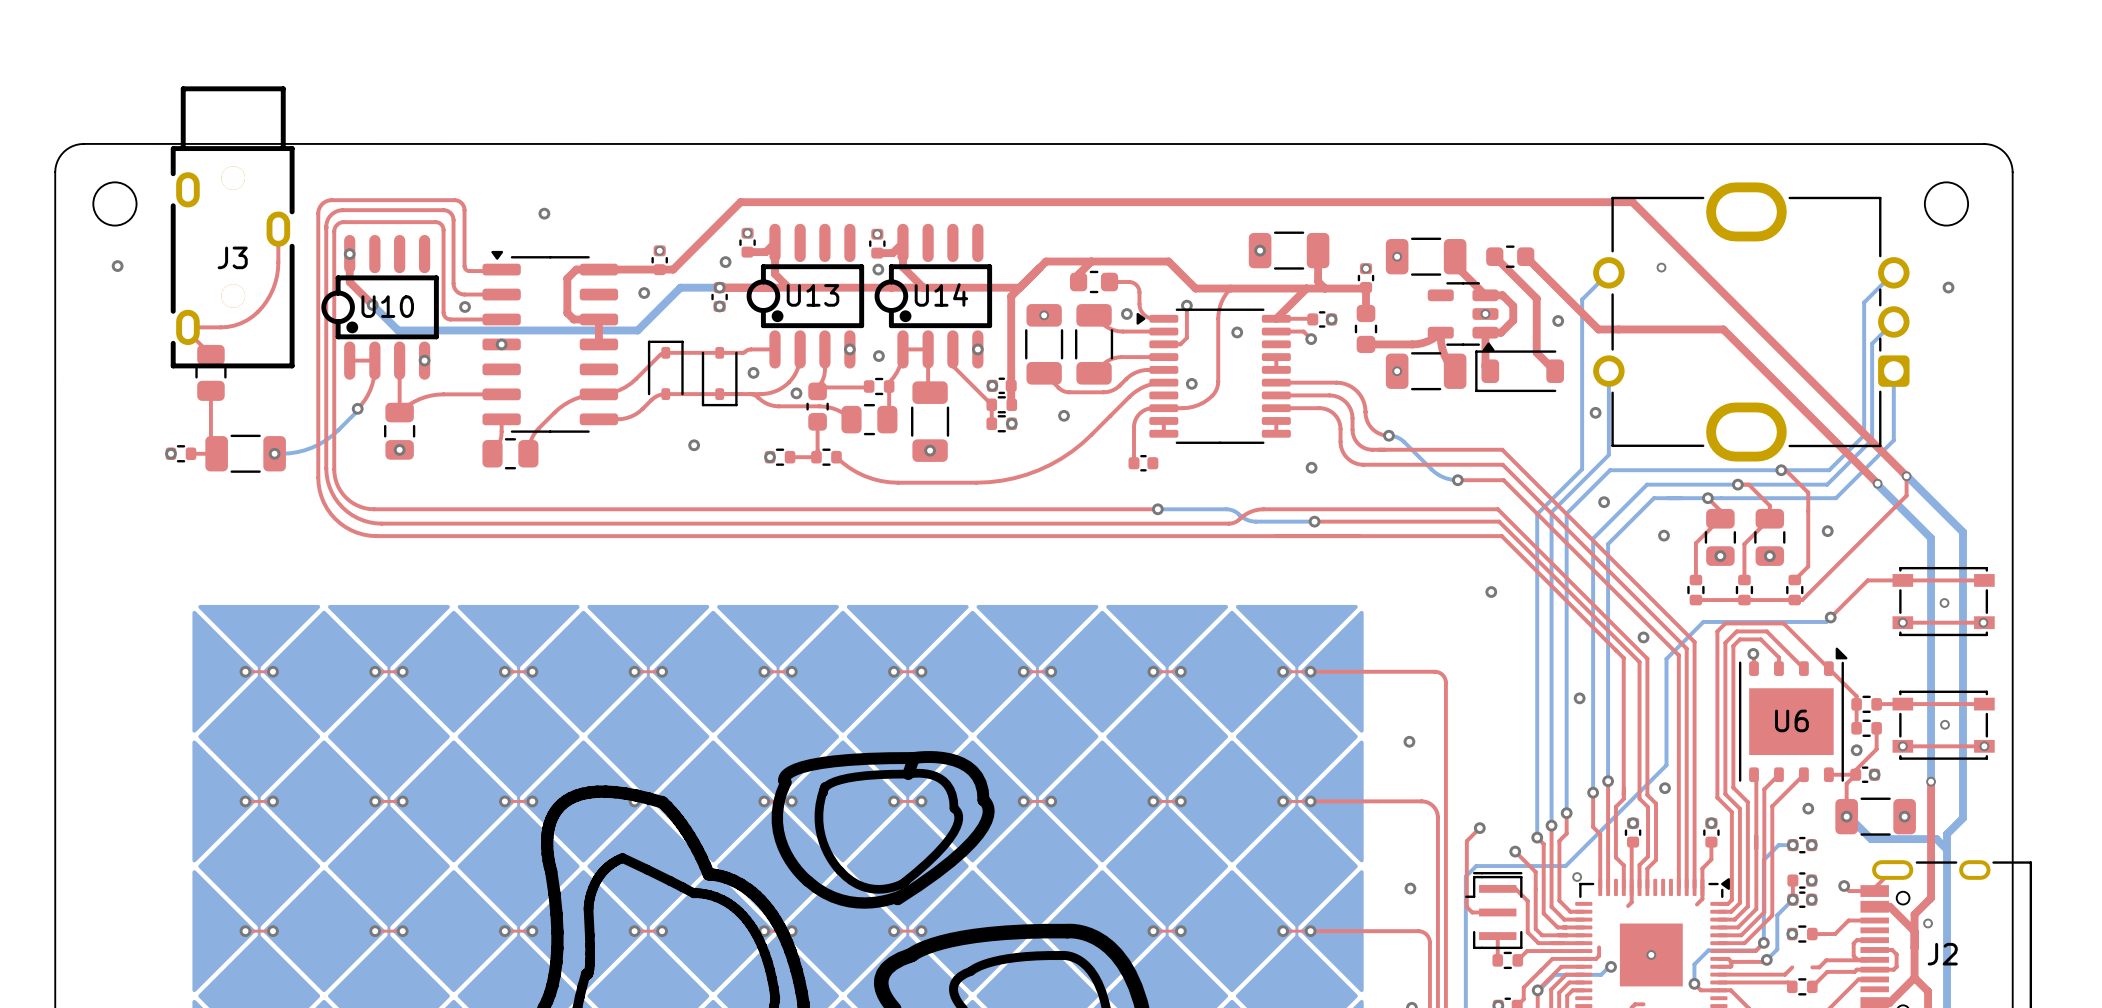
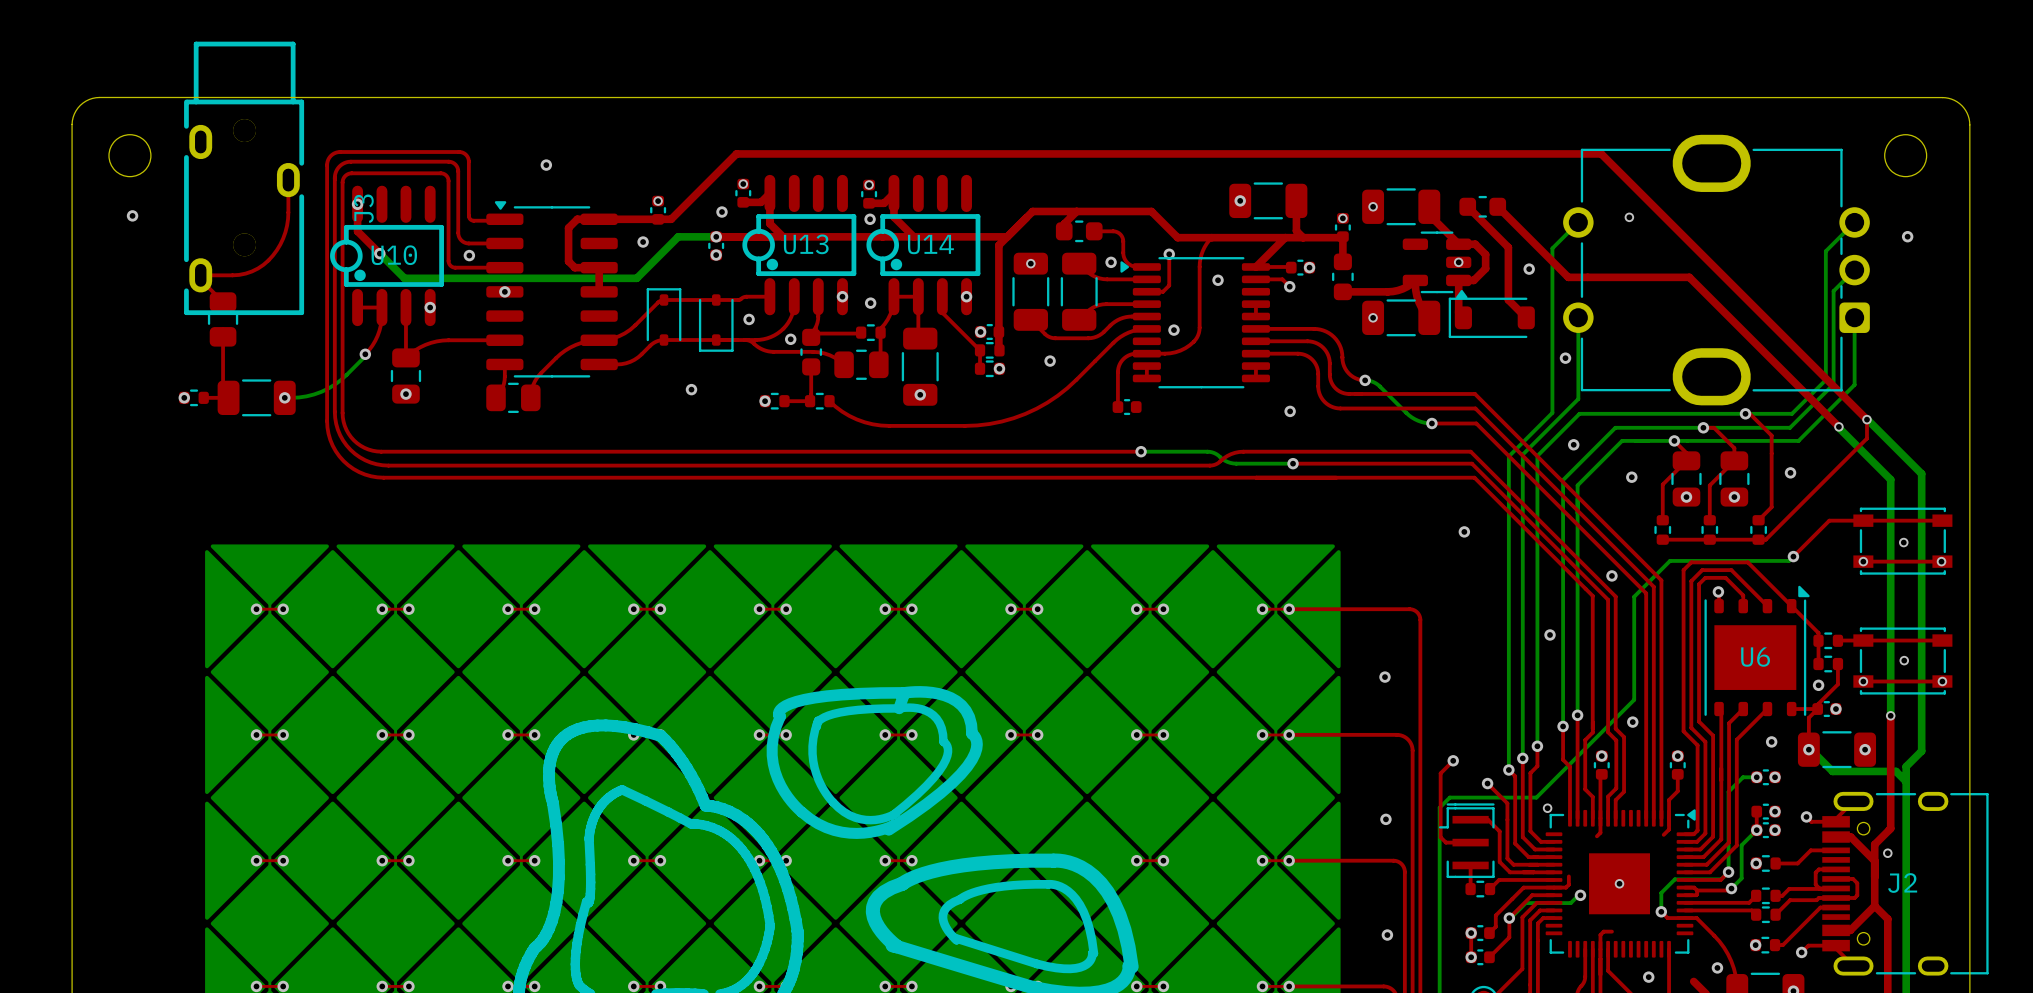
J3 name rotation: 0° (232, 257) -> 90° counterclockwise (363, 208)
J3 name position: J3 (232, 257) -> J3 (363, 208)
part: none -> (1765, 895)

